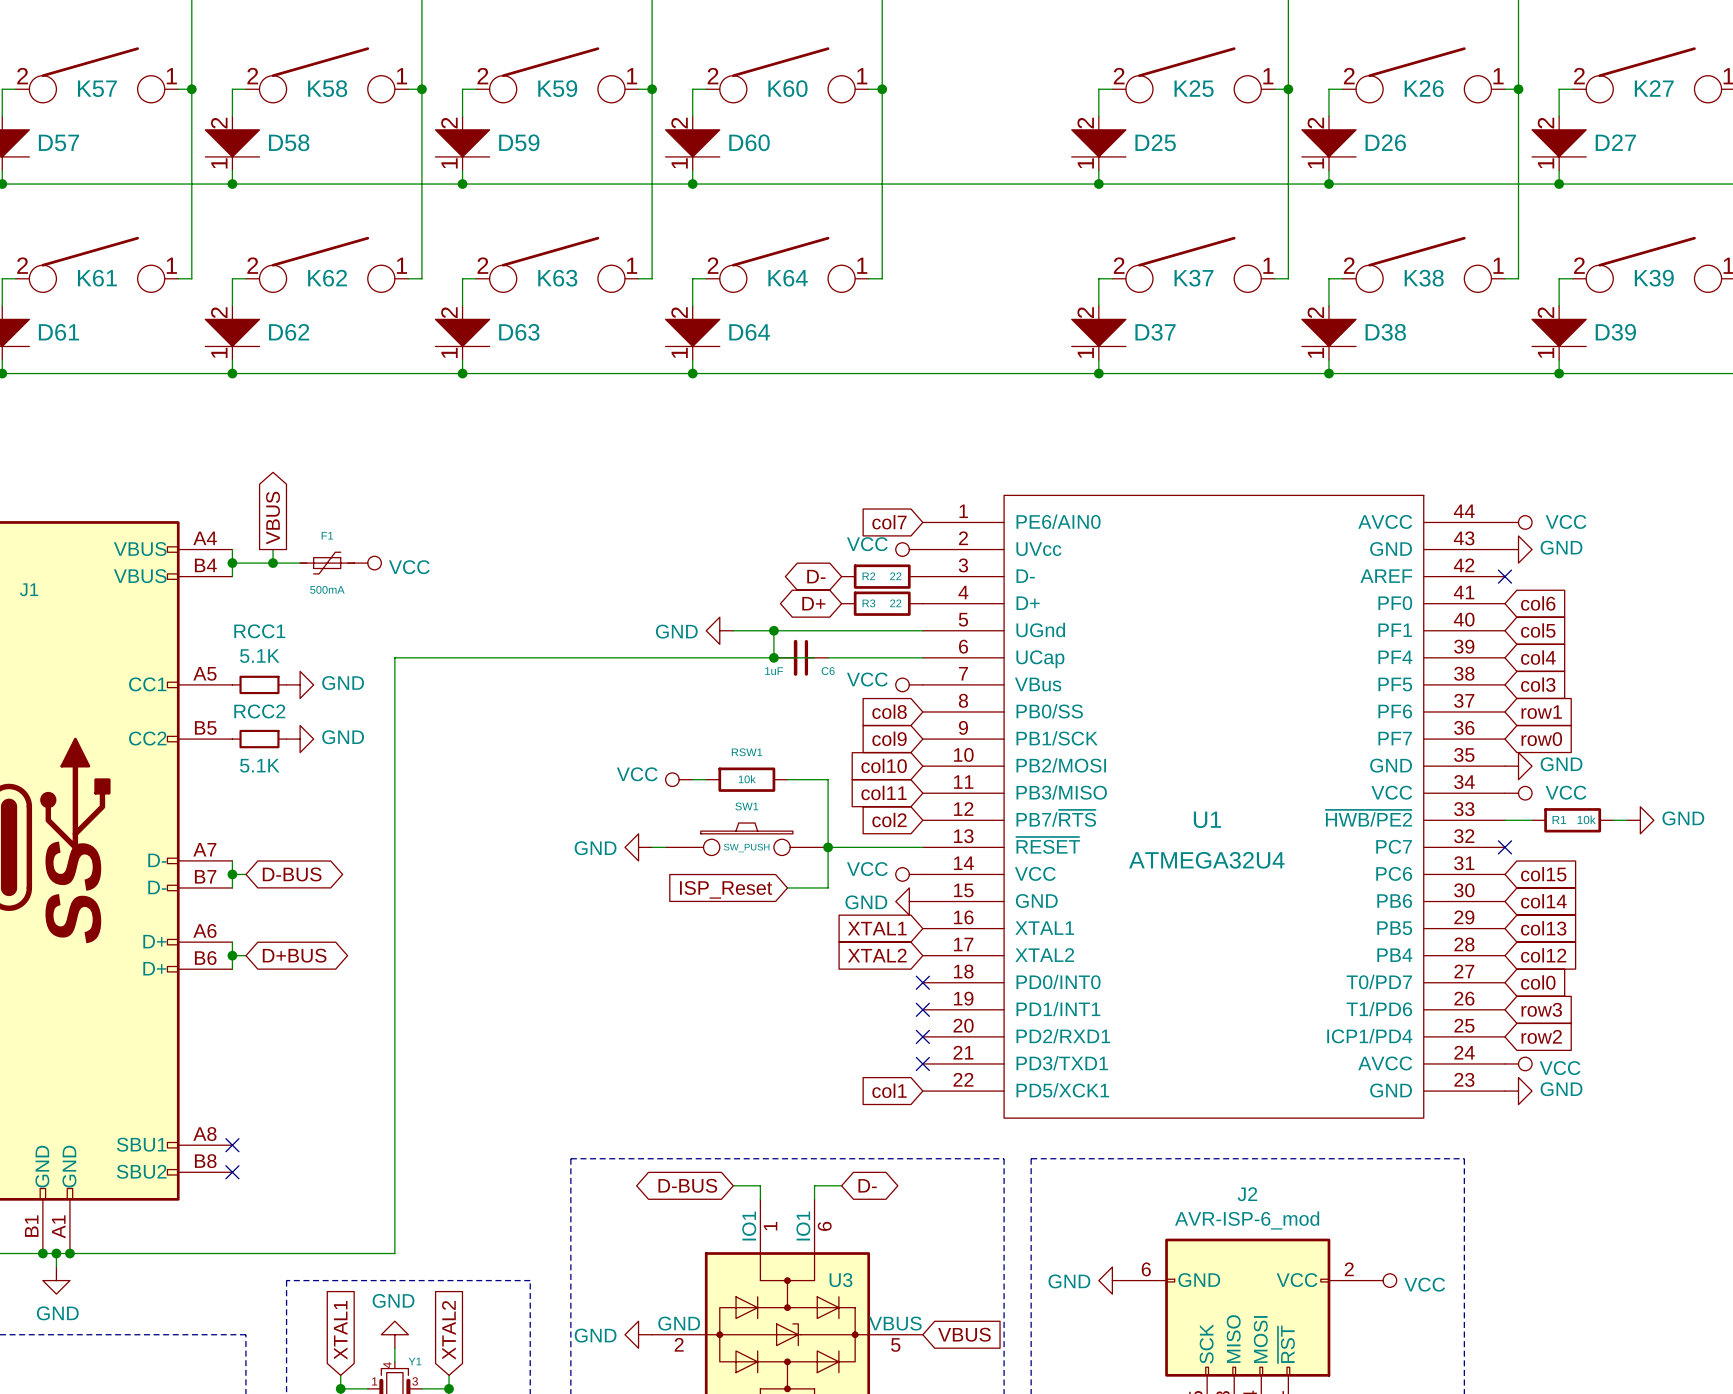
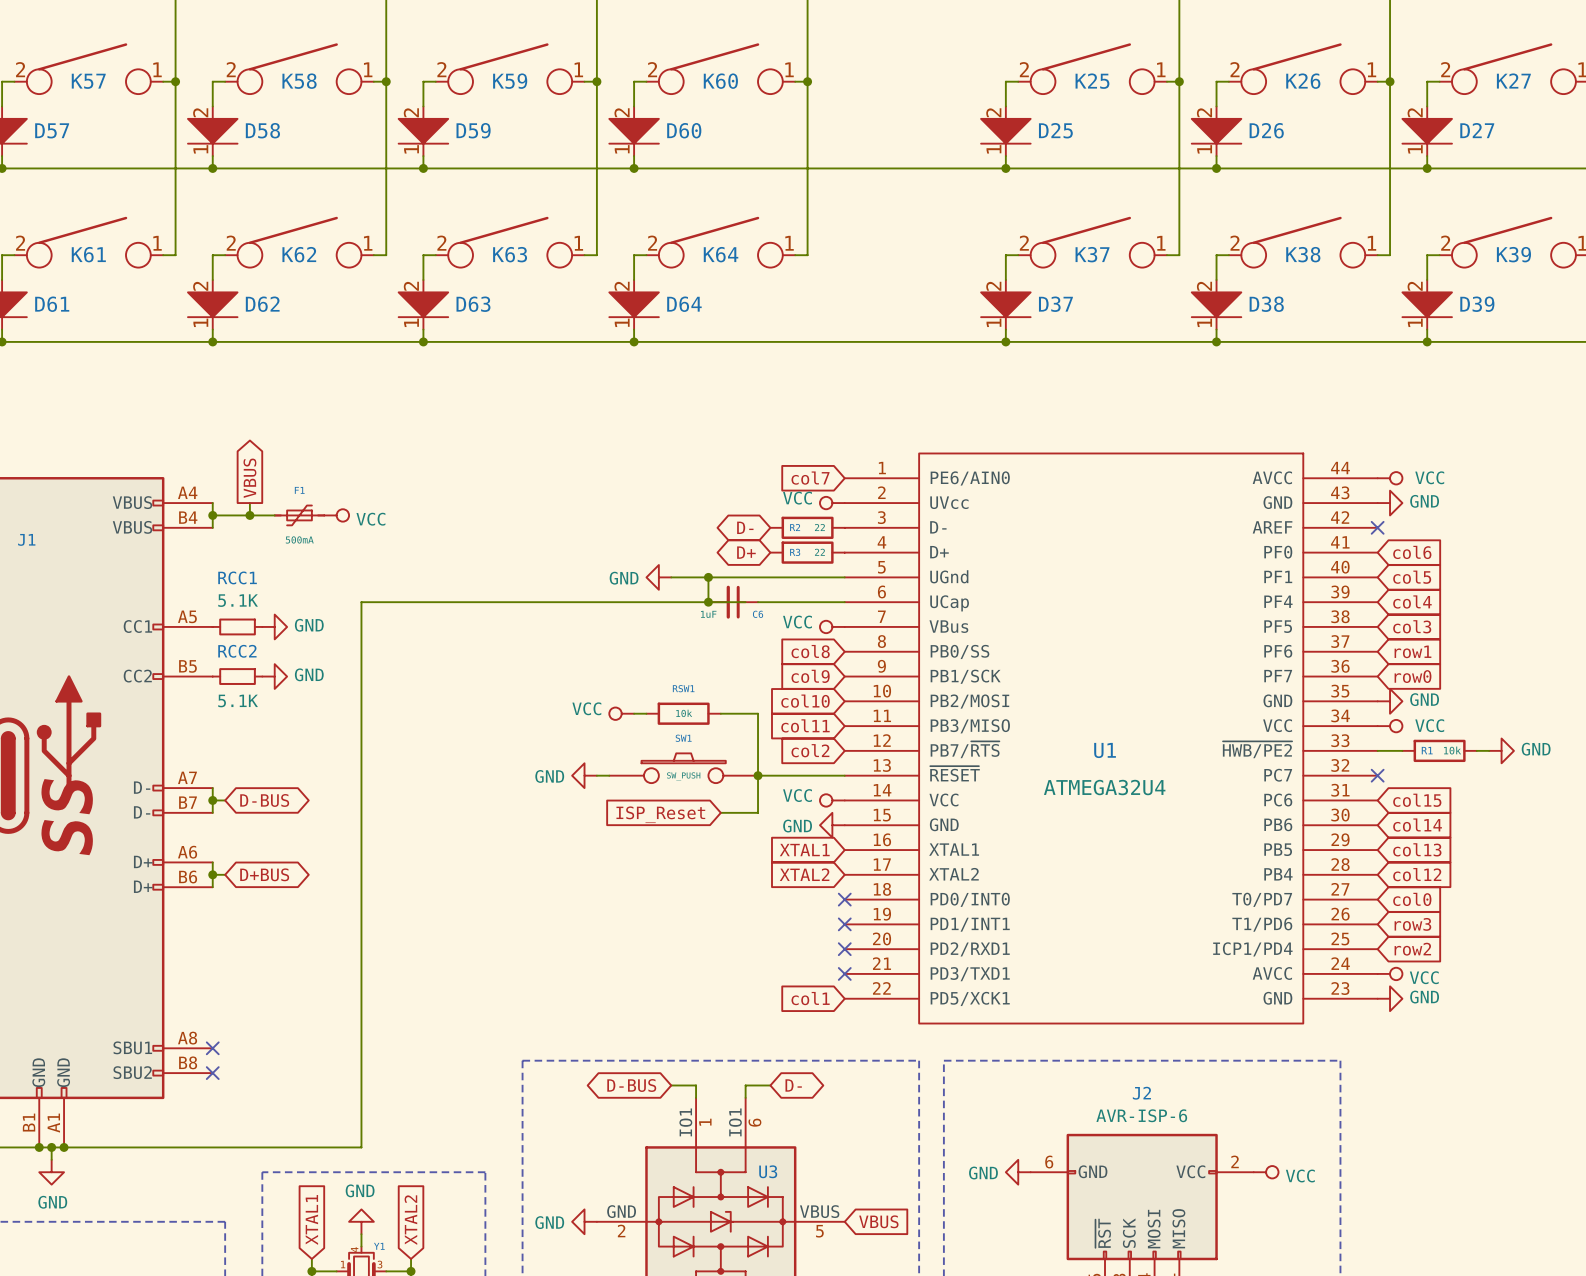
J2 value: AVR-ISP-6_mod (1247, 1220) -> AVR-ISP-6 (1141, 1115)
J2 pin name: MISO (1233, 1339) -> SCK (1129, 1233)
J2 pin name: SCK (1206, 1343) -> ~{RST} (1103, 1233)
J2 pin name: ~{RST} (1286, 1344) -> MISO (1178, 1228)

